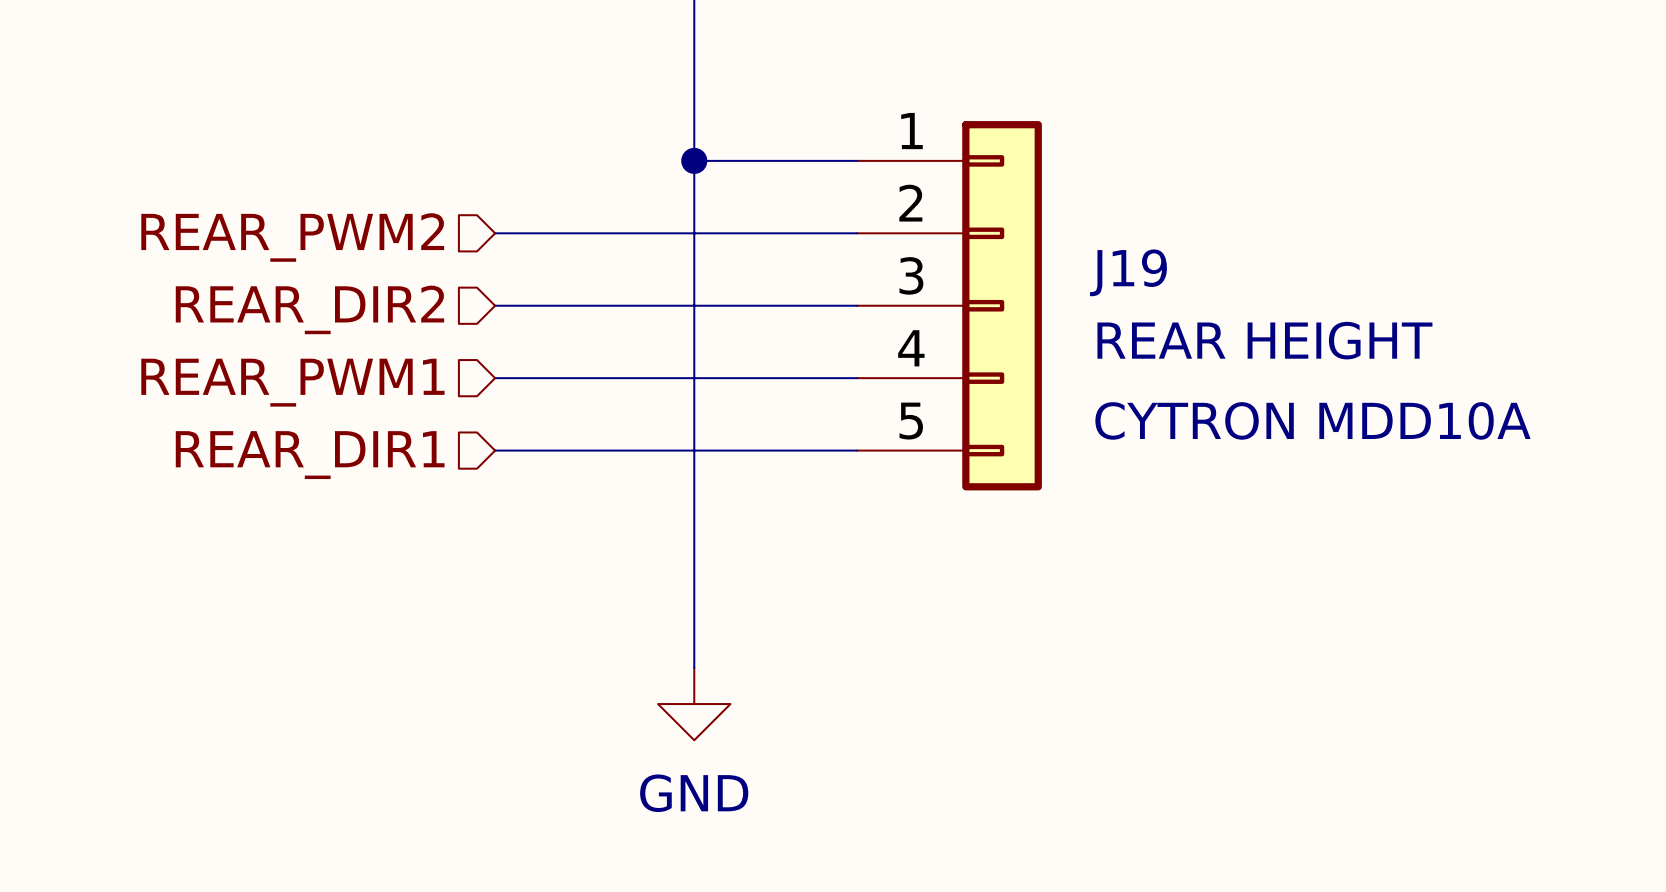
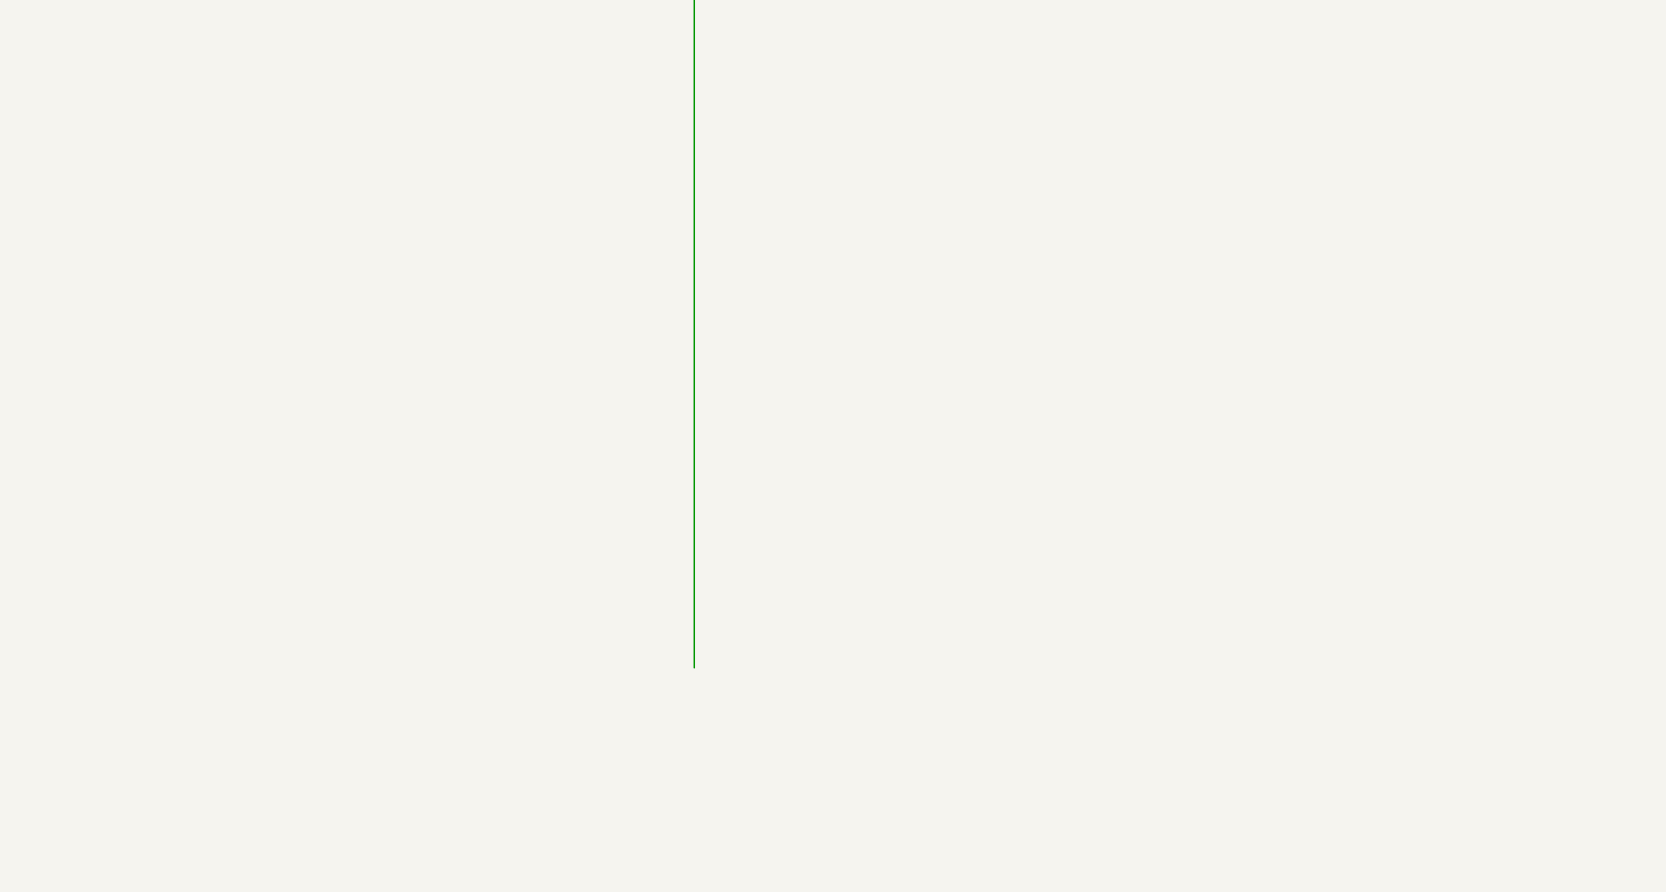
wire: (694, 160) (857, 160) -> none
junction: (694, 160) -> none
wire: (495, 233) (857, 233) -> none
hierarchical label: REAR_PWM2 (292, 237) -> none
wire: (495, 305) (857, 305) -> none
J19: REAR HEIGHT (949, 305) -> none
hierarchical label: REAR_DIR2 (309, 309) -> none
wire: (495, 378) (857, 378) -> none
hierarchical label: REAR_PWM1 (292, 382) -> none
text: CYTRON MDD10A (1312, 420) -> none
wire: (495, 450) (857, 450) -> none
hierarchical label: REAR_DIR1 (310, 455) -> none
power symbol: GND (694, 704) -> none

